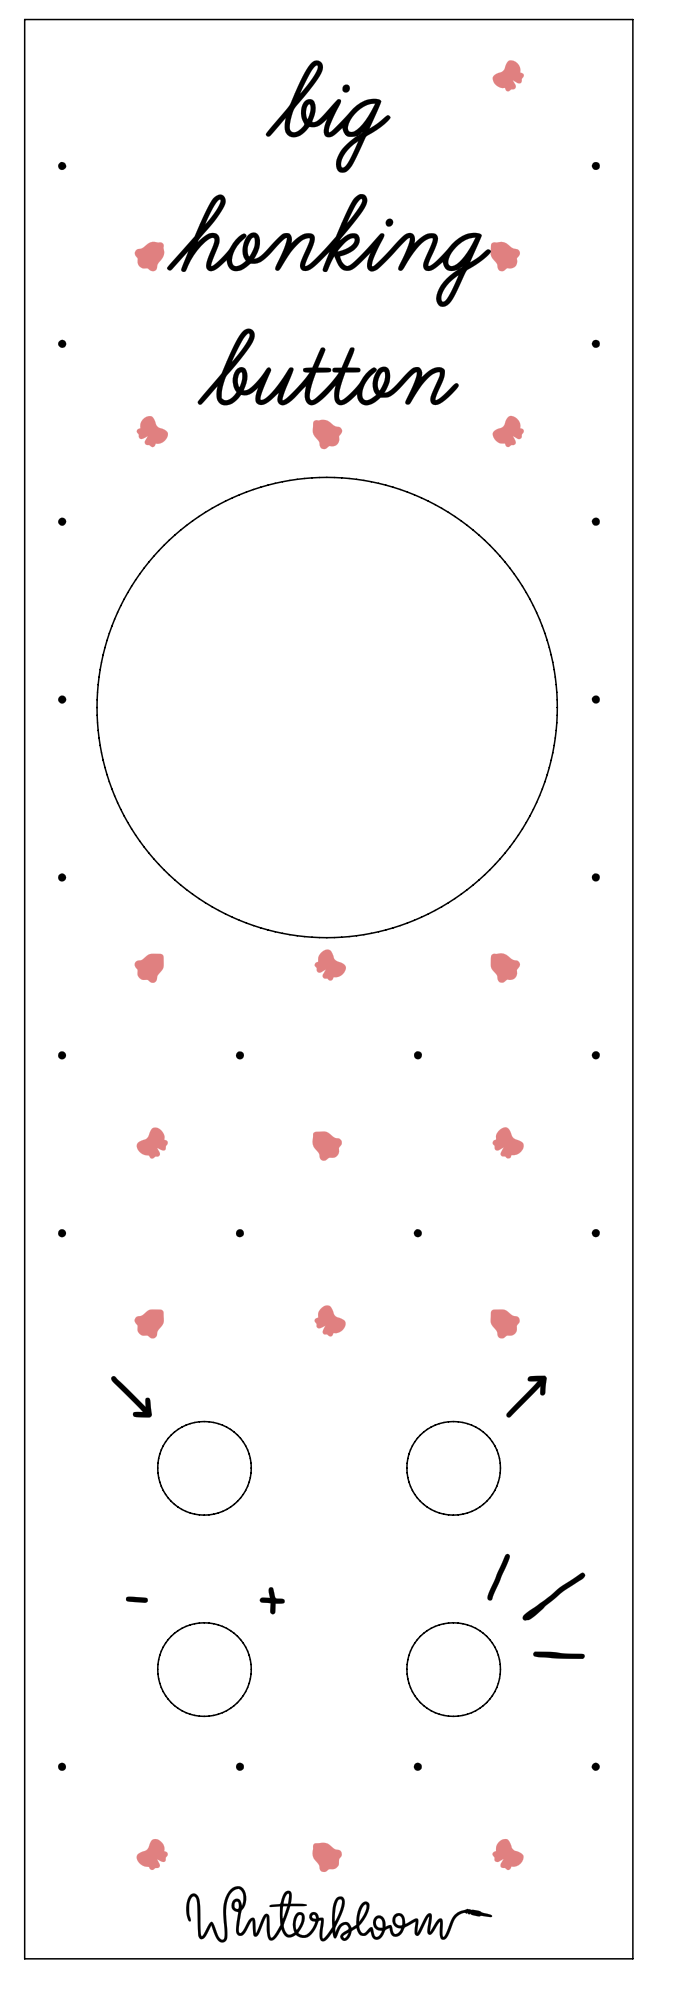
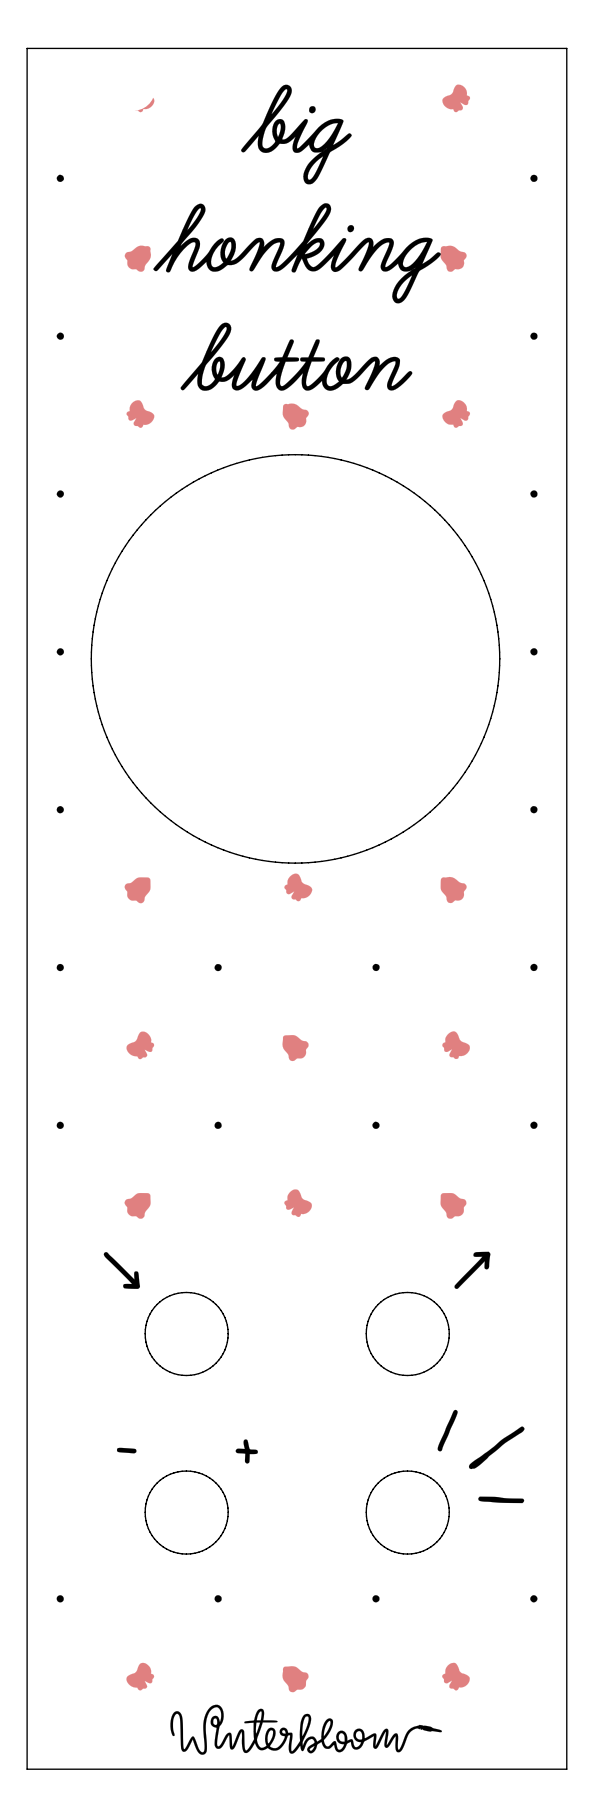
drawing shape: [134, 60, 524, 1873] -> [124, 84, 471, 1693]

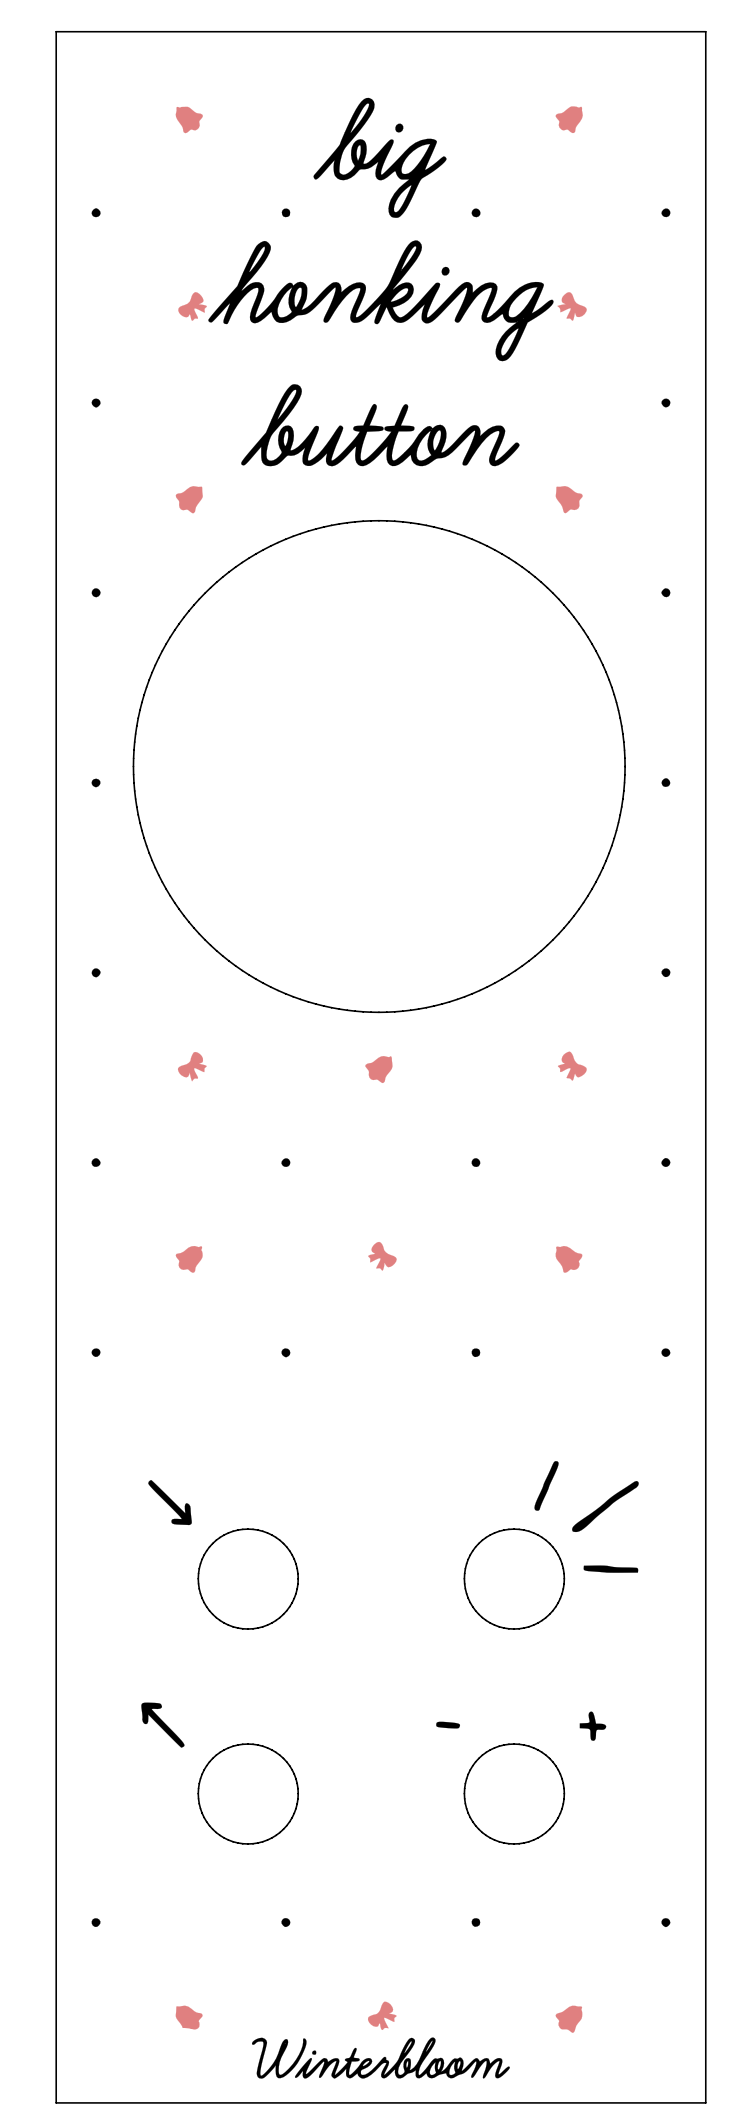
drawing: [56, 84, 538, 1755] -> none
drawing: none -> [91, 97, 671, 2079]

